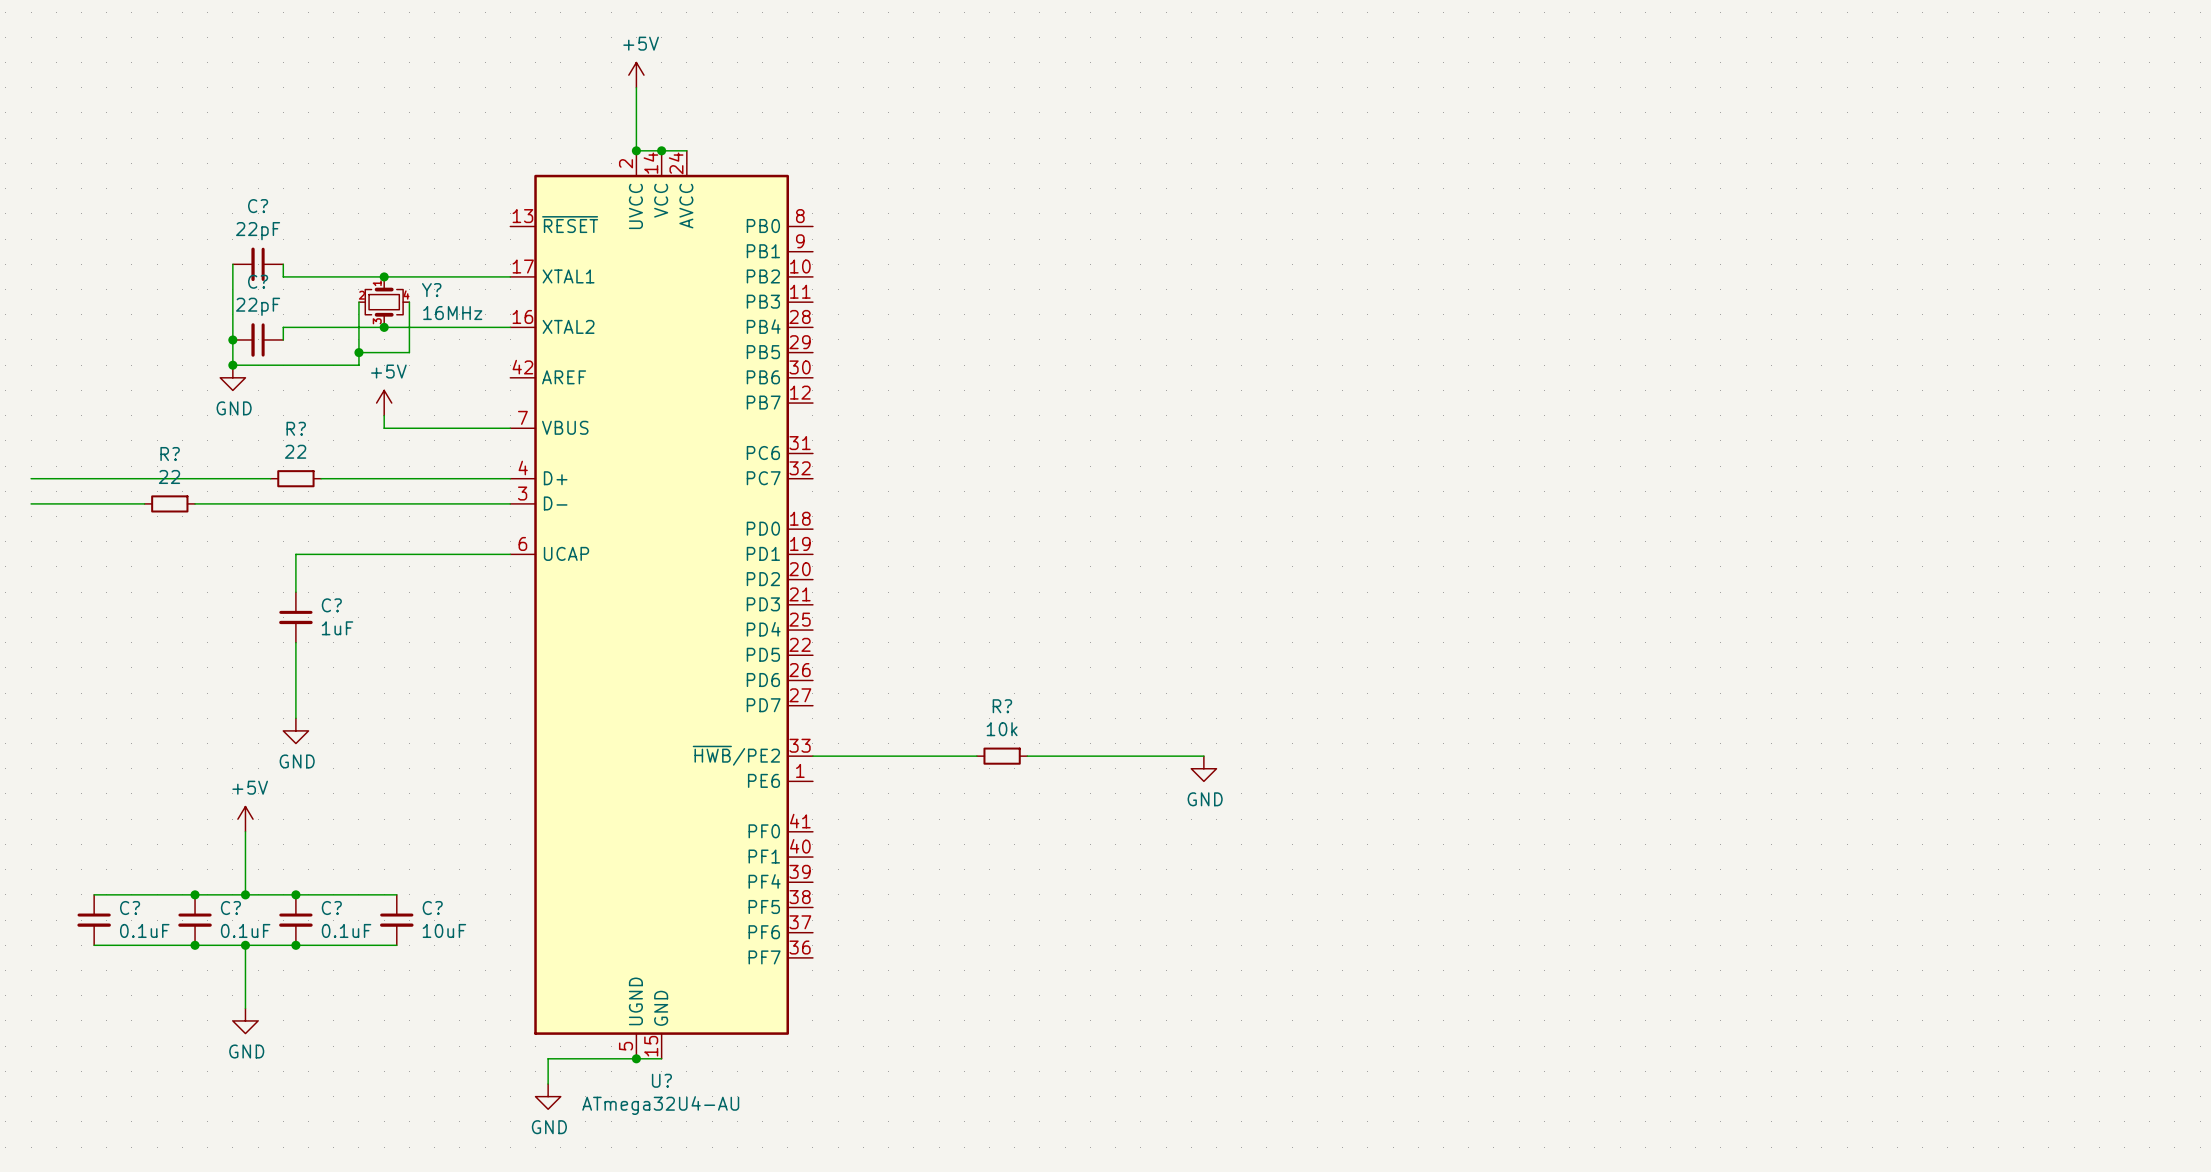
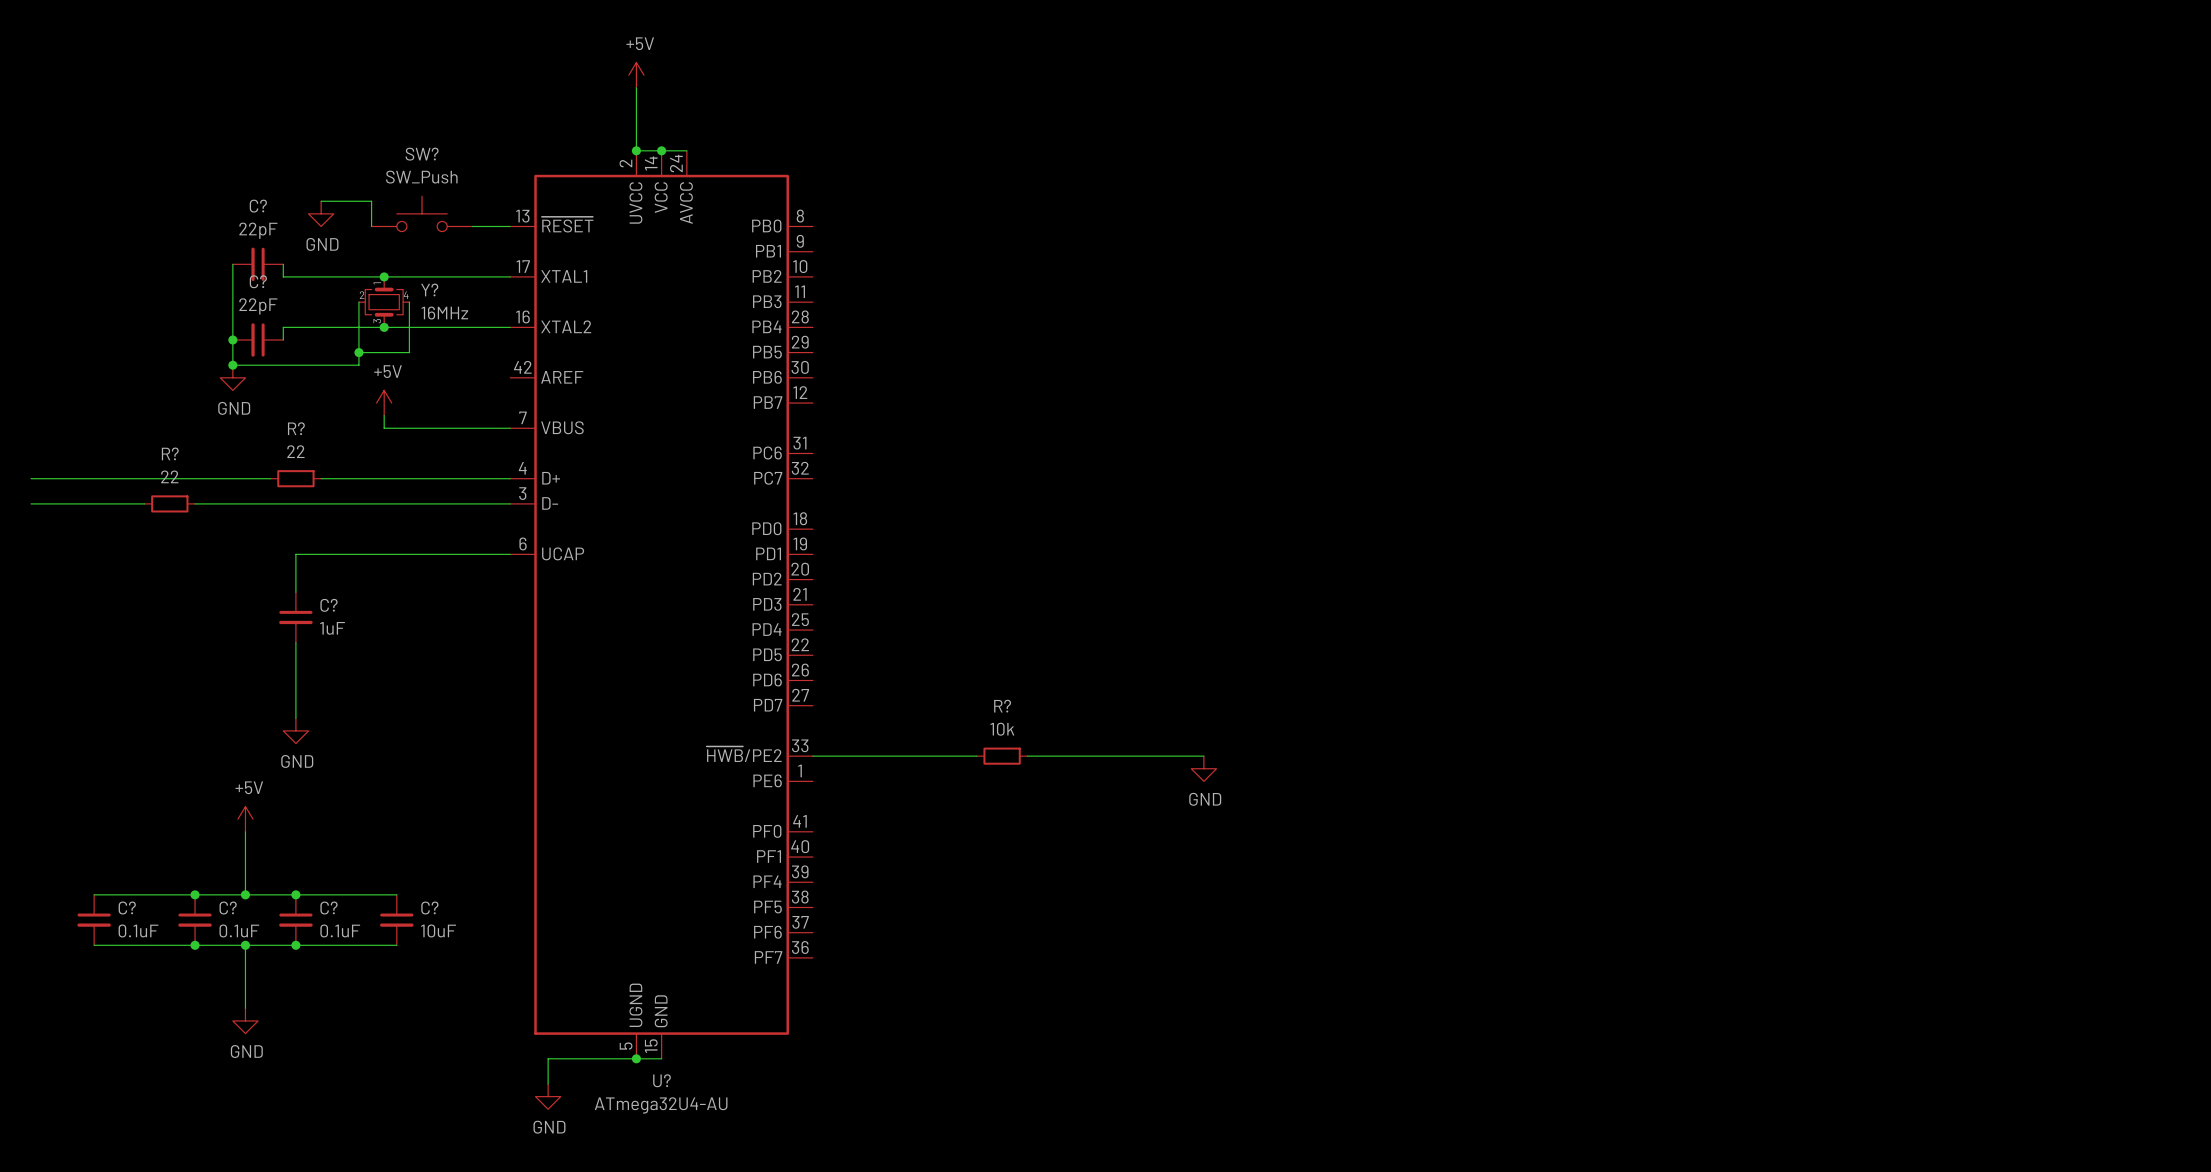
wire: none -> (321, 201) (371, 201) (371, 226)
power symbol: none -> GND (321, 213)
SW?: none -> SW_Push (422, 213)
wire: none -> (472, 226) (510, 226)

